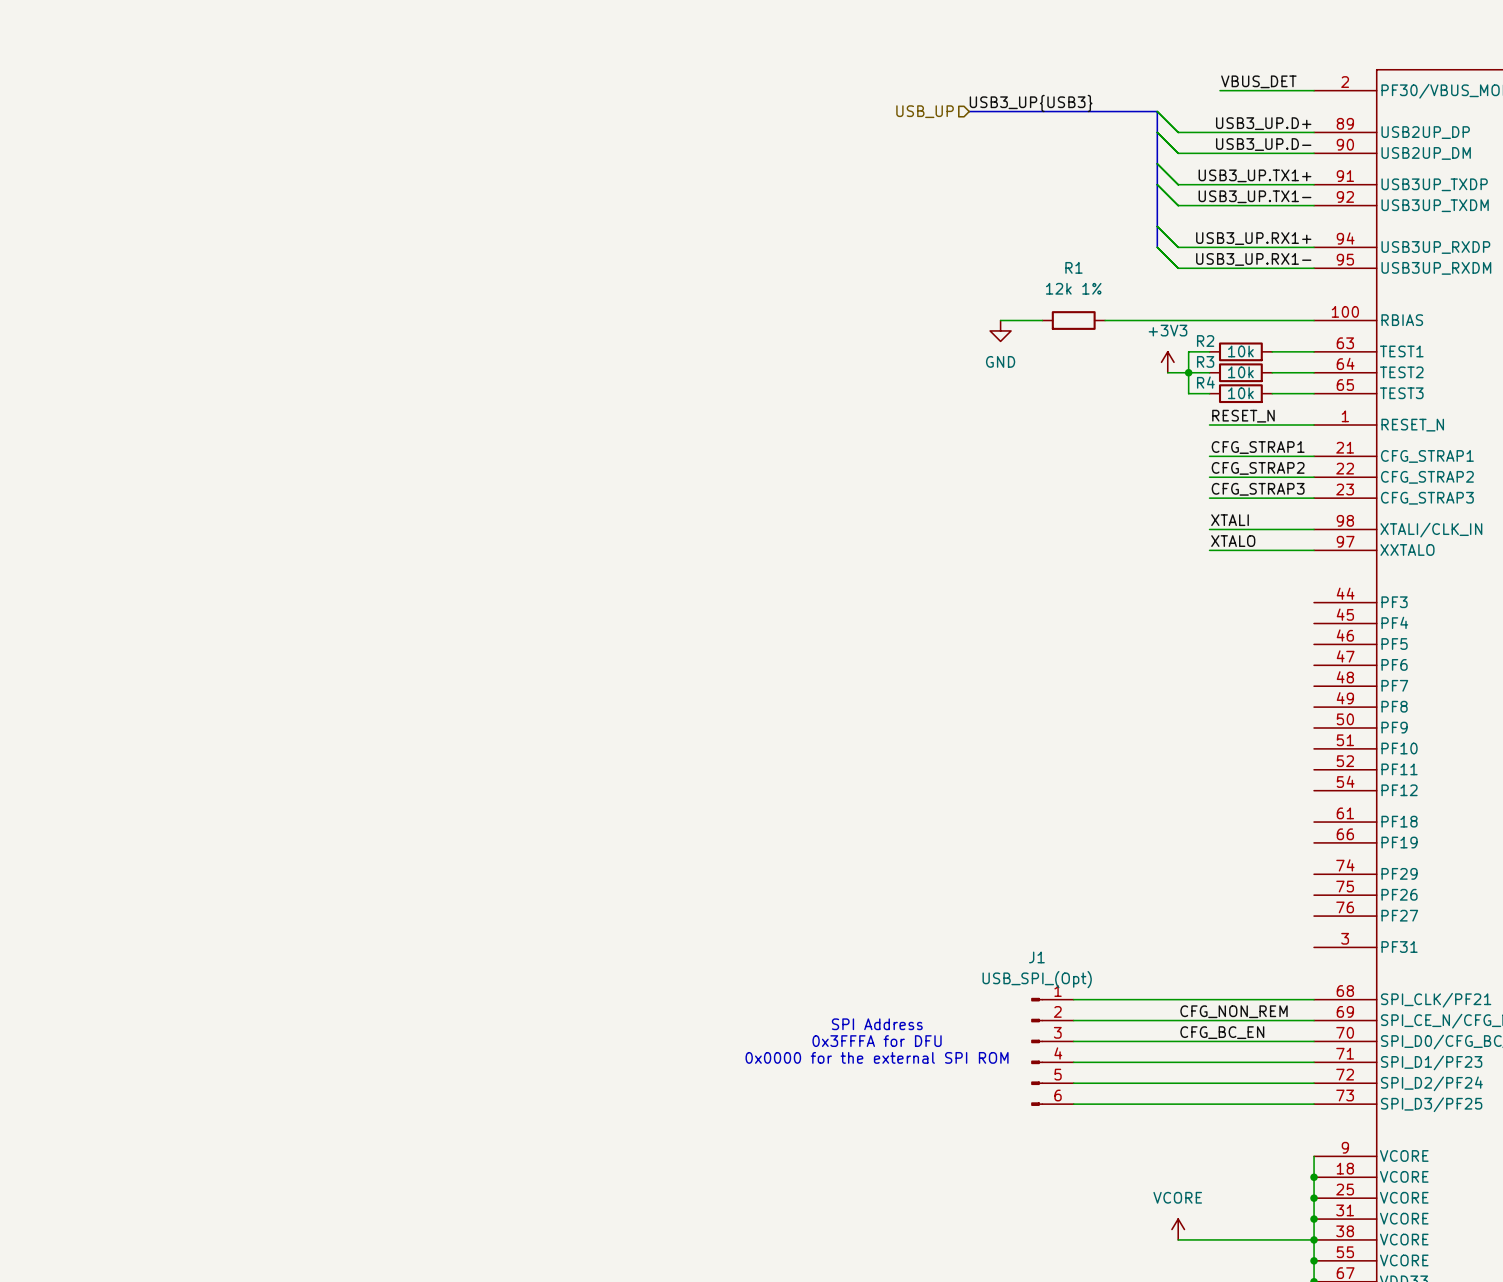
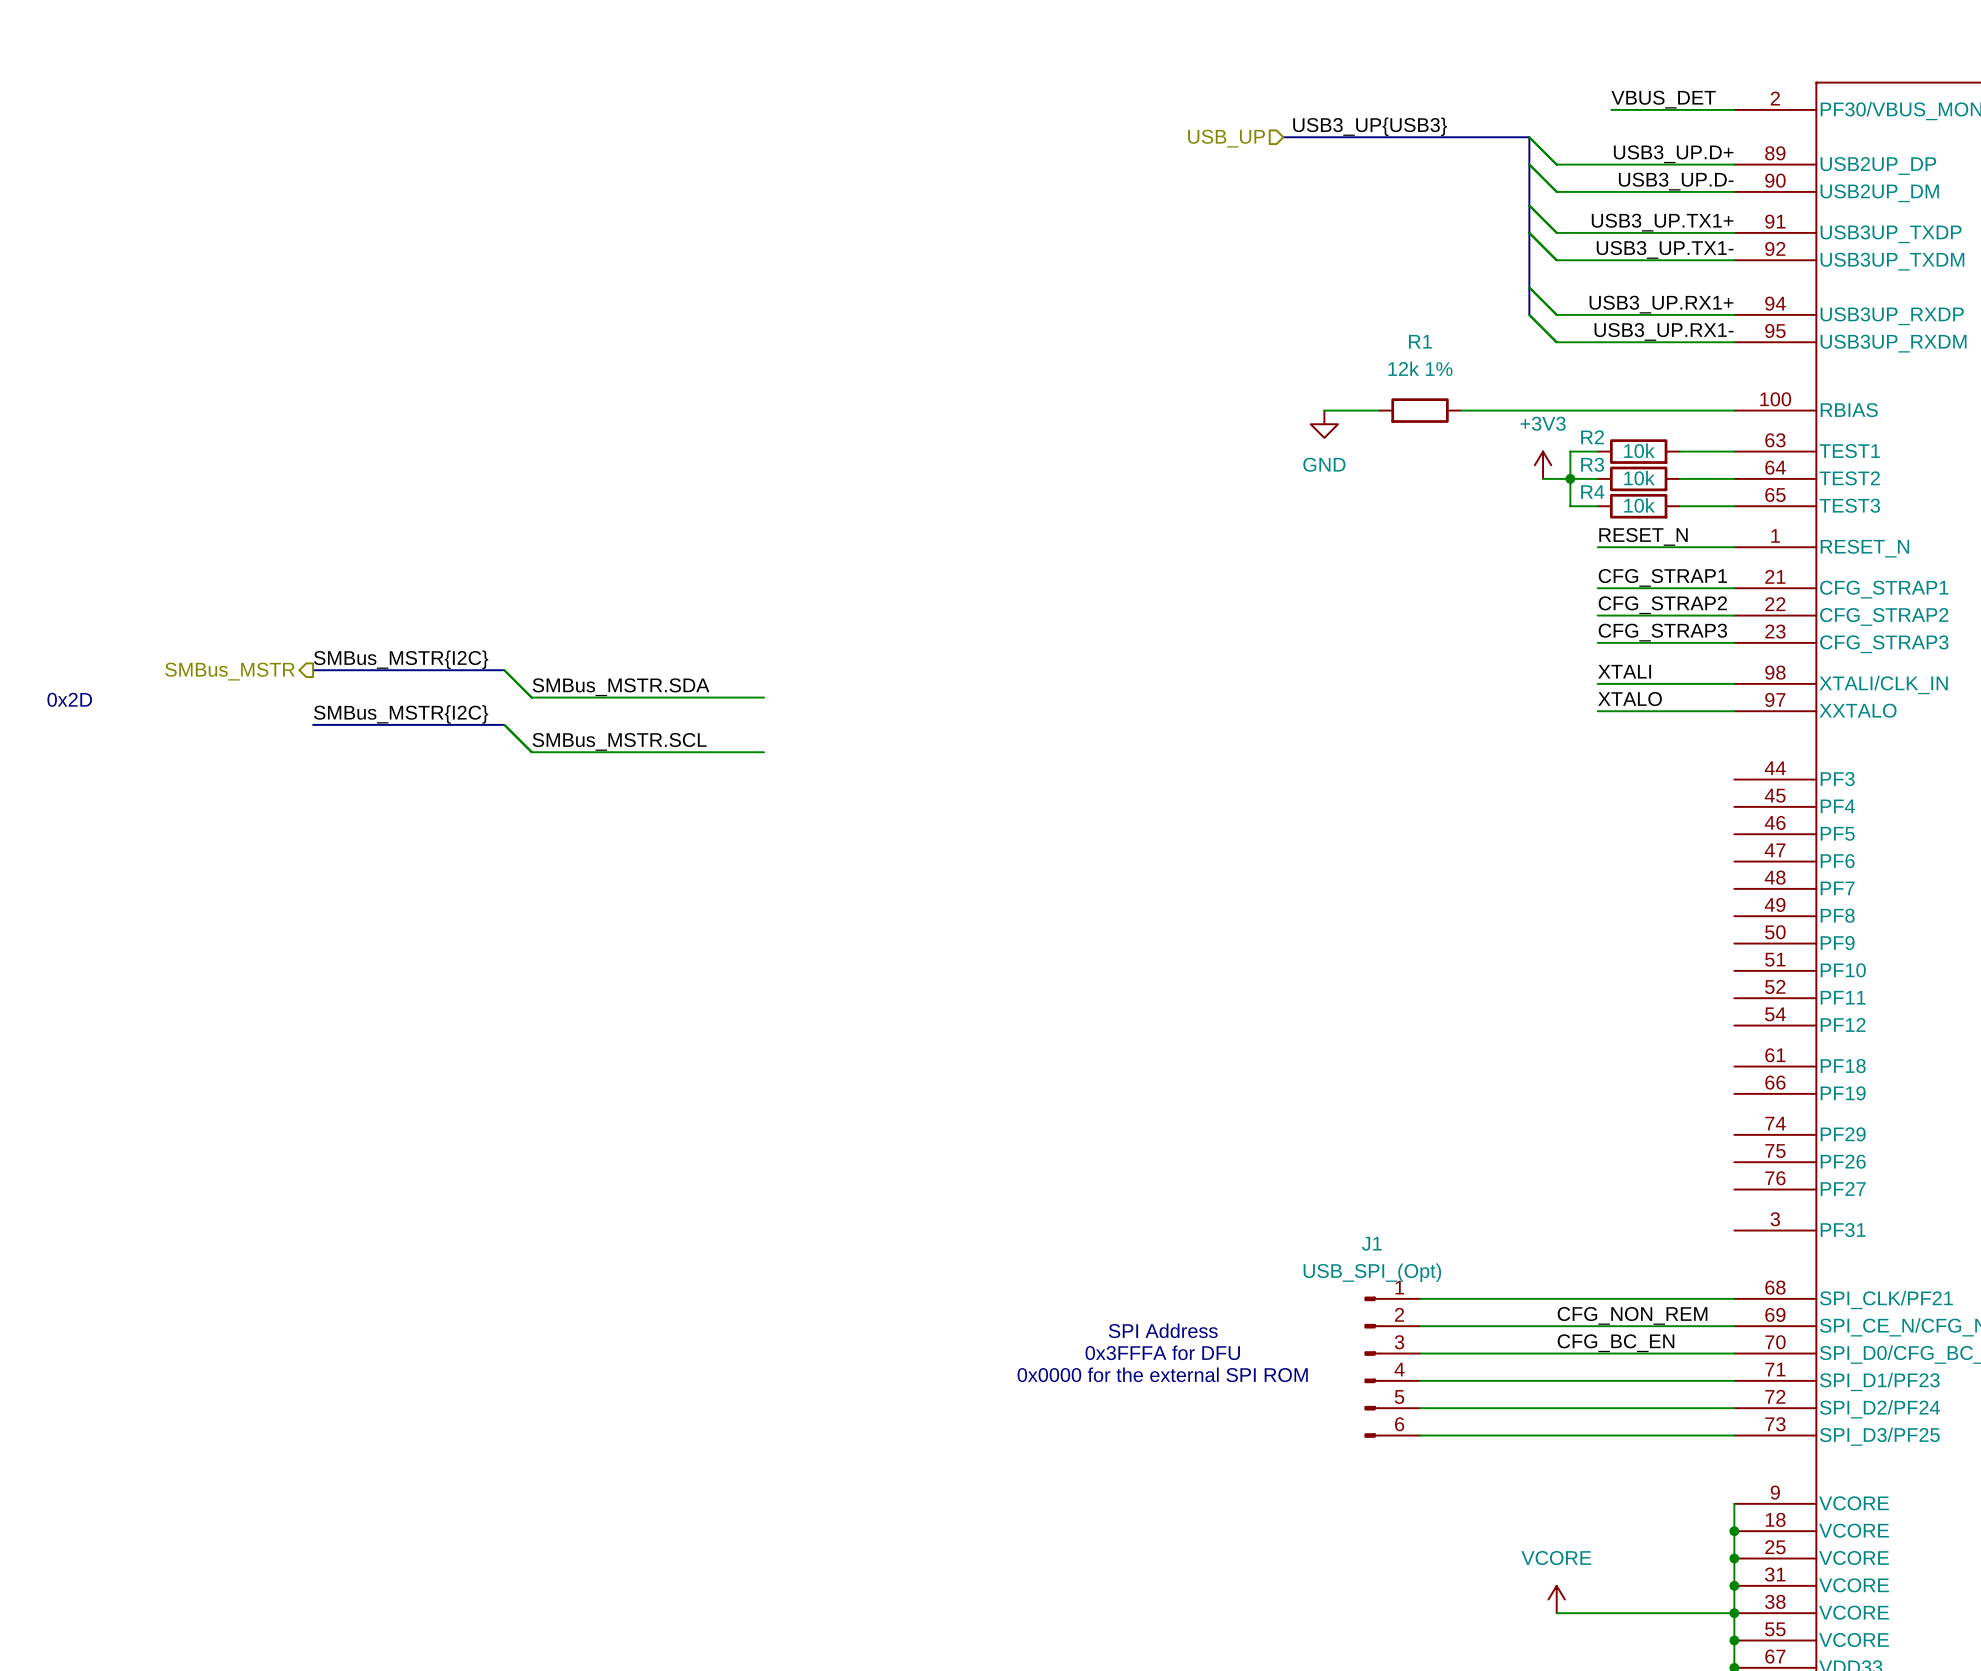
label: none -> SMBus_MSTR{I2C} (401, 659)
hierarchical label: none -> SMBus_MSTR (230, 671)
bus: none -> (313, 670) (504, 670)
wire: none -> (504, 670) (531, 697) (764, 697)
label: none -> SMBus_MSTR.SDA (621, 687)
text: none -> 0x2D (69, 699)
label: none -> SMBus_MSTR{I2C} (401, 714)
bus: none -> (313, 724) (504, 724)
wire: none -> (504, 724) (531, 752) (764, 752)
label: none -> SMBus_MSTR.SCL (619, 741)

